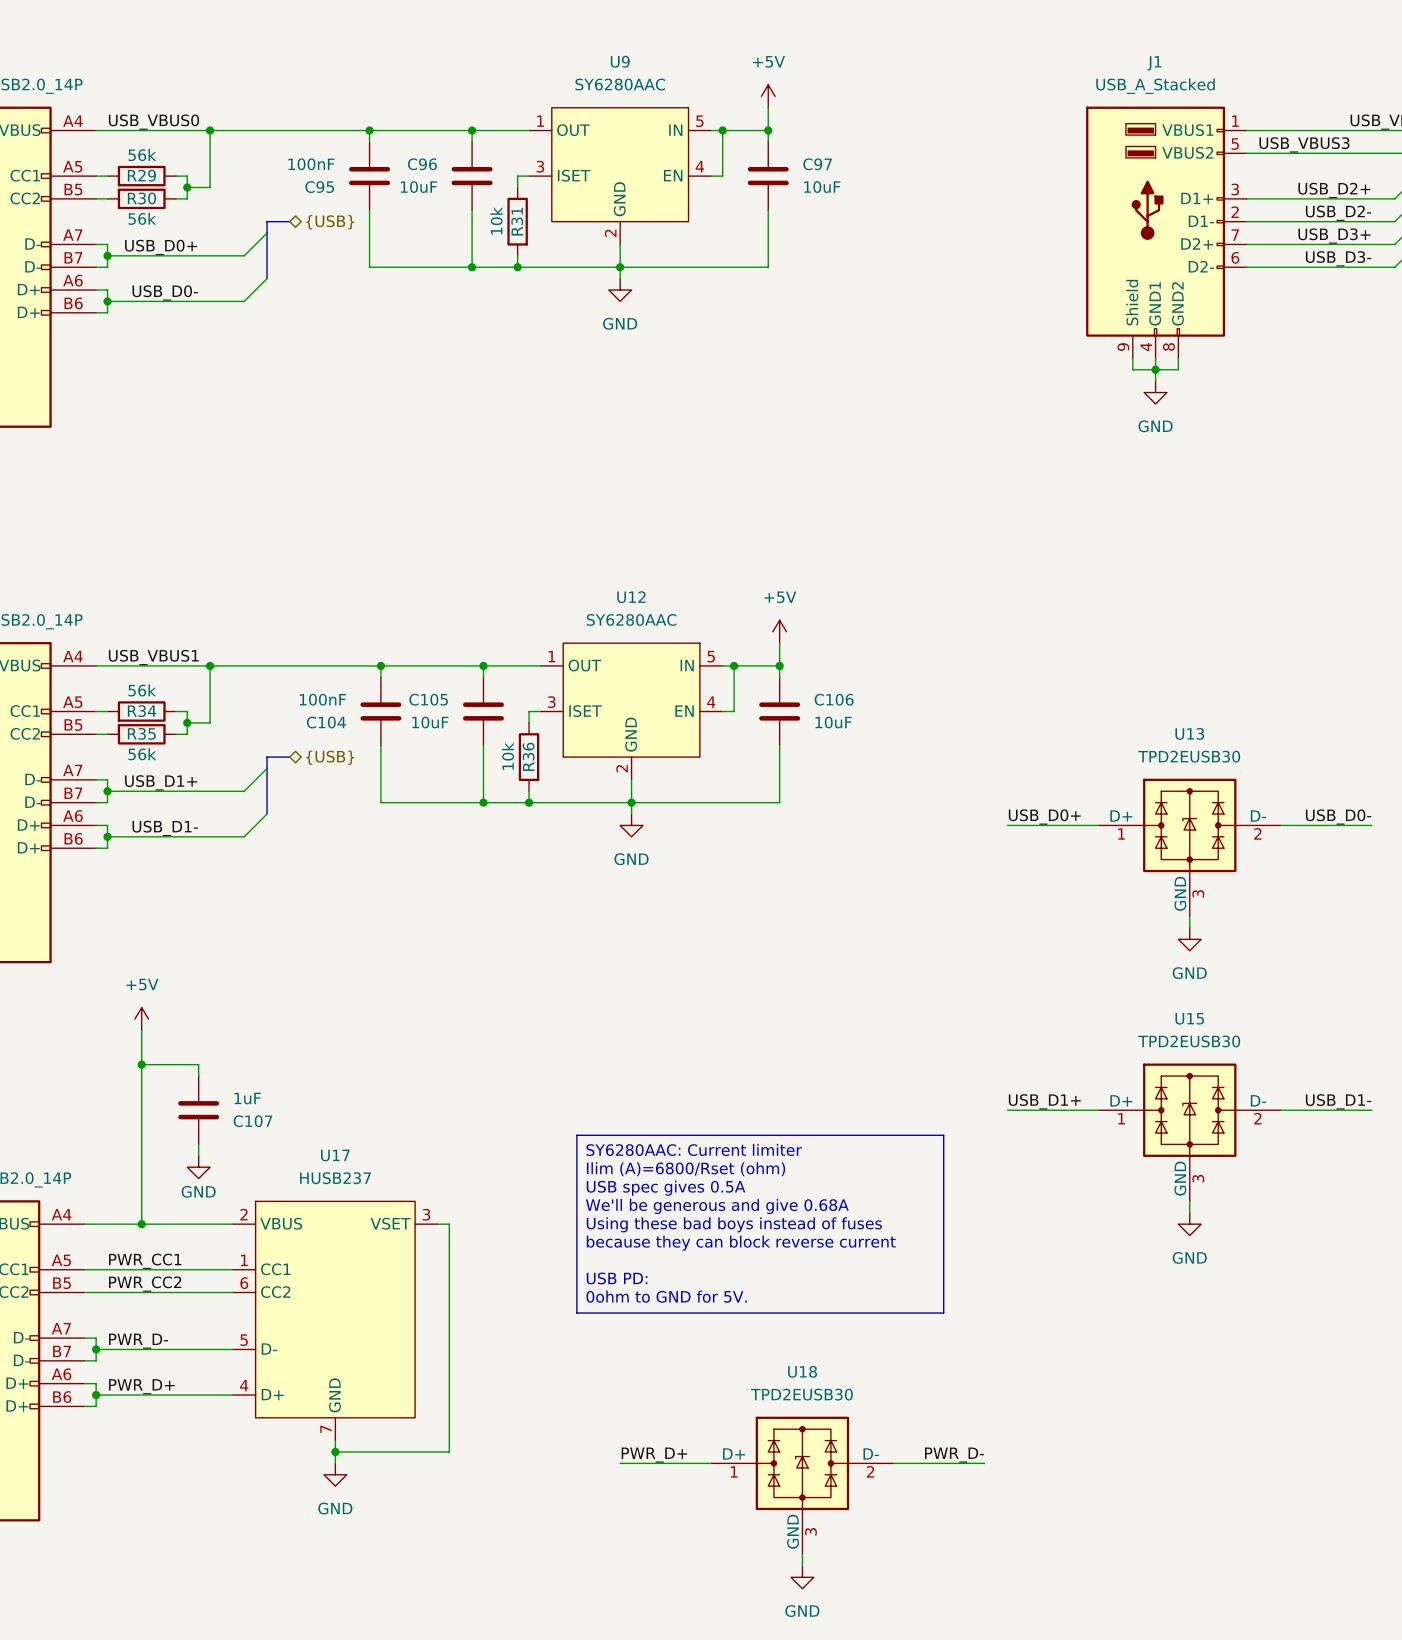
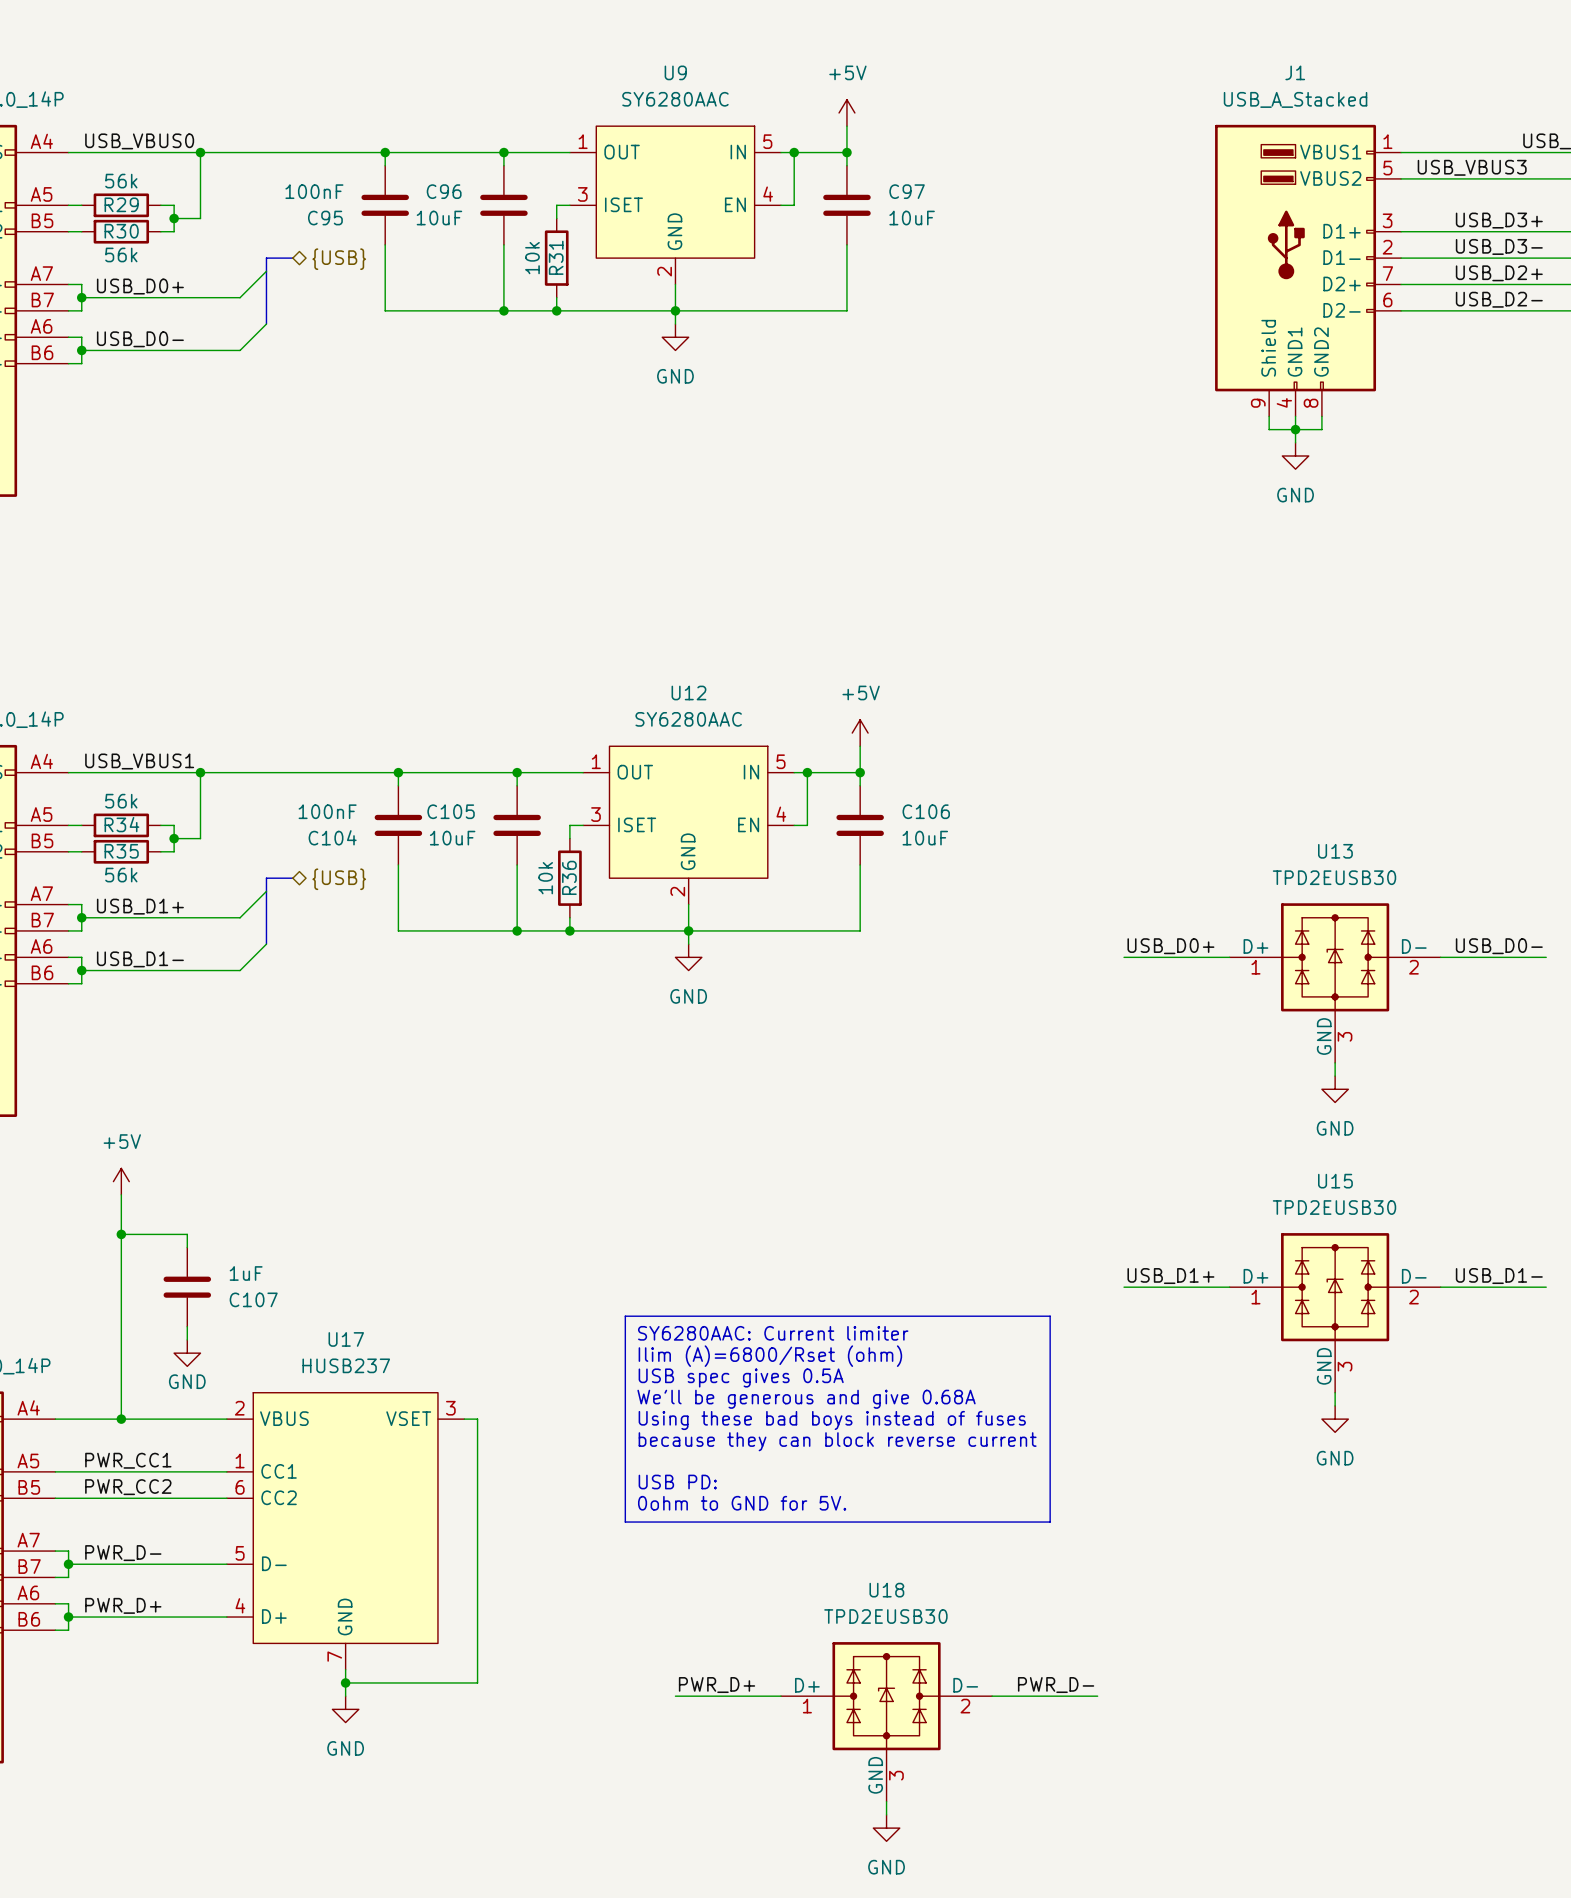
label: USB_D2+ (1334, 190) -> USB_D3+ (1499, 220)
label: USB_D2- (1338, 213) -> USB_D3- (1499, 246)
label: USB_D3+ (1334, 236) -> USB_D2+ (1499, 273)
label: USB_D3- (1338, 258) -> USB_D2- (1499, 299)

